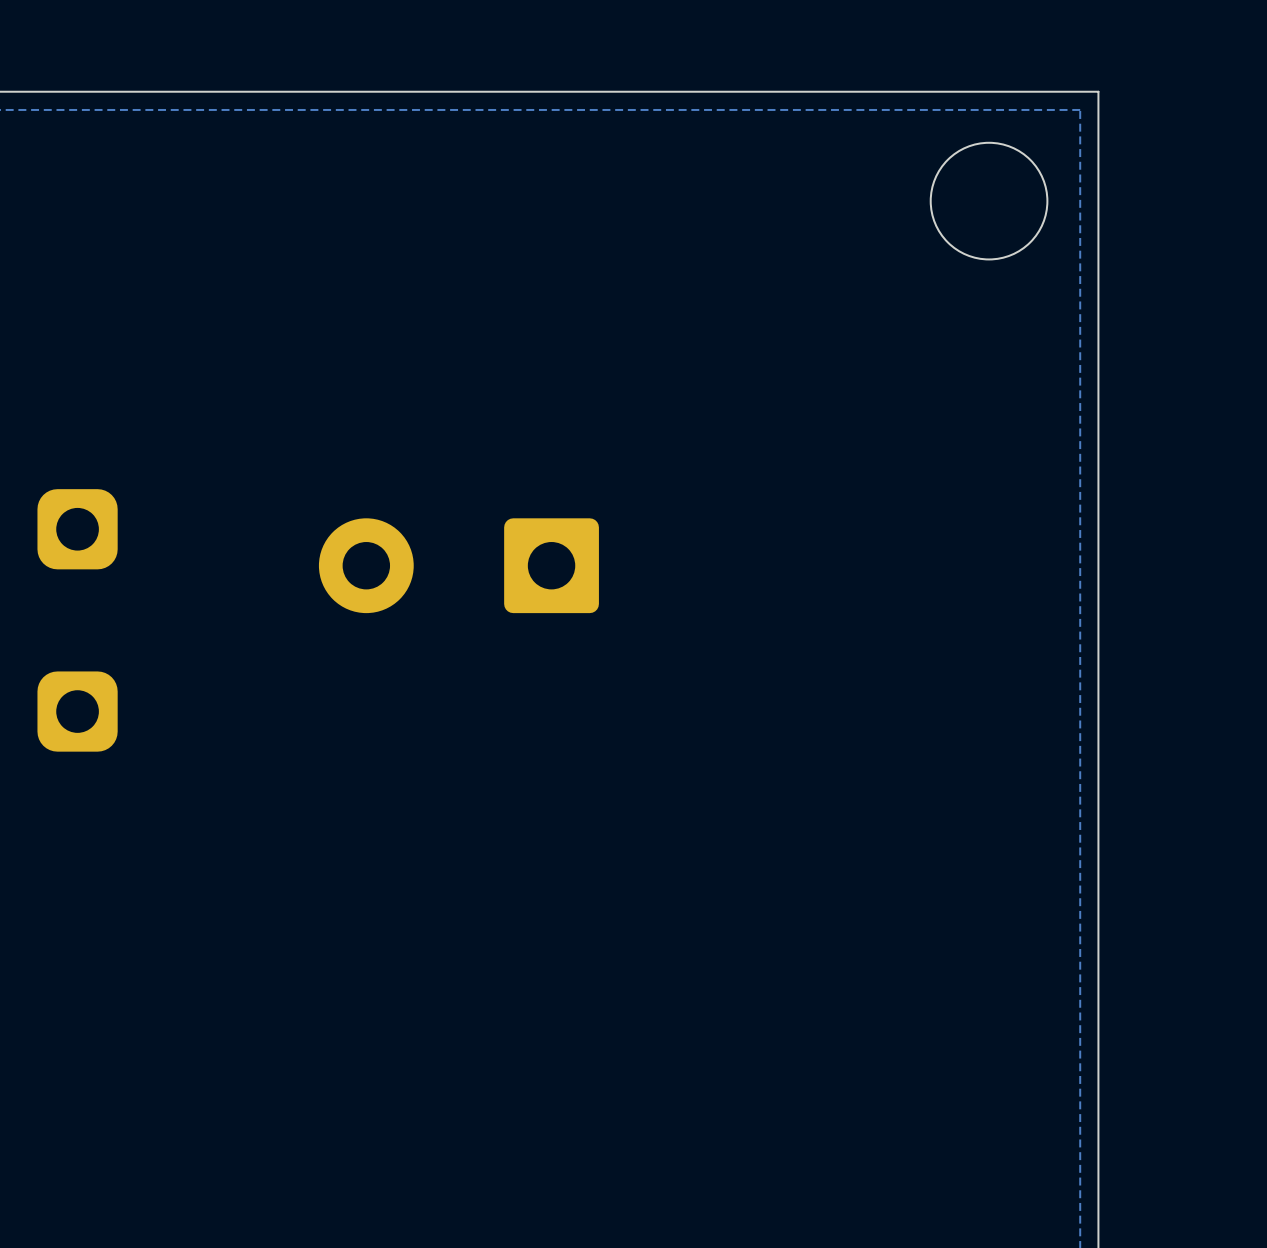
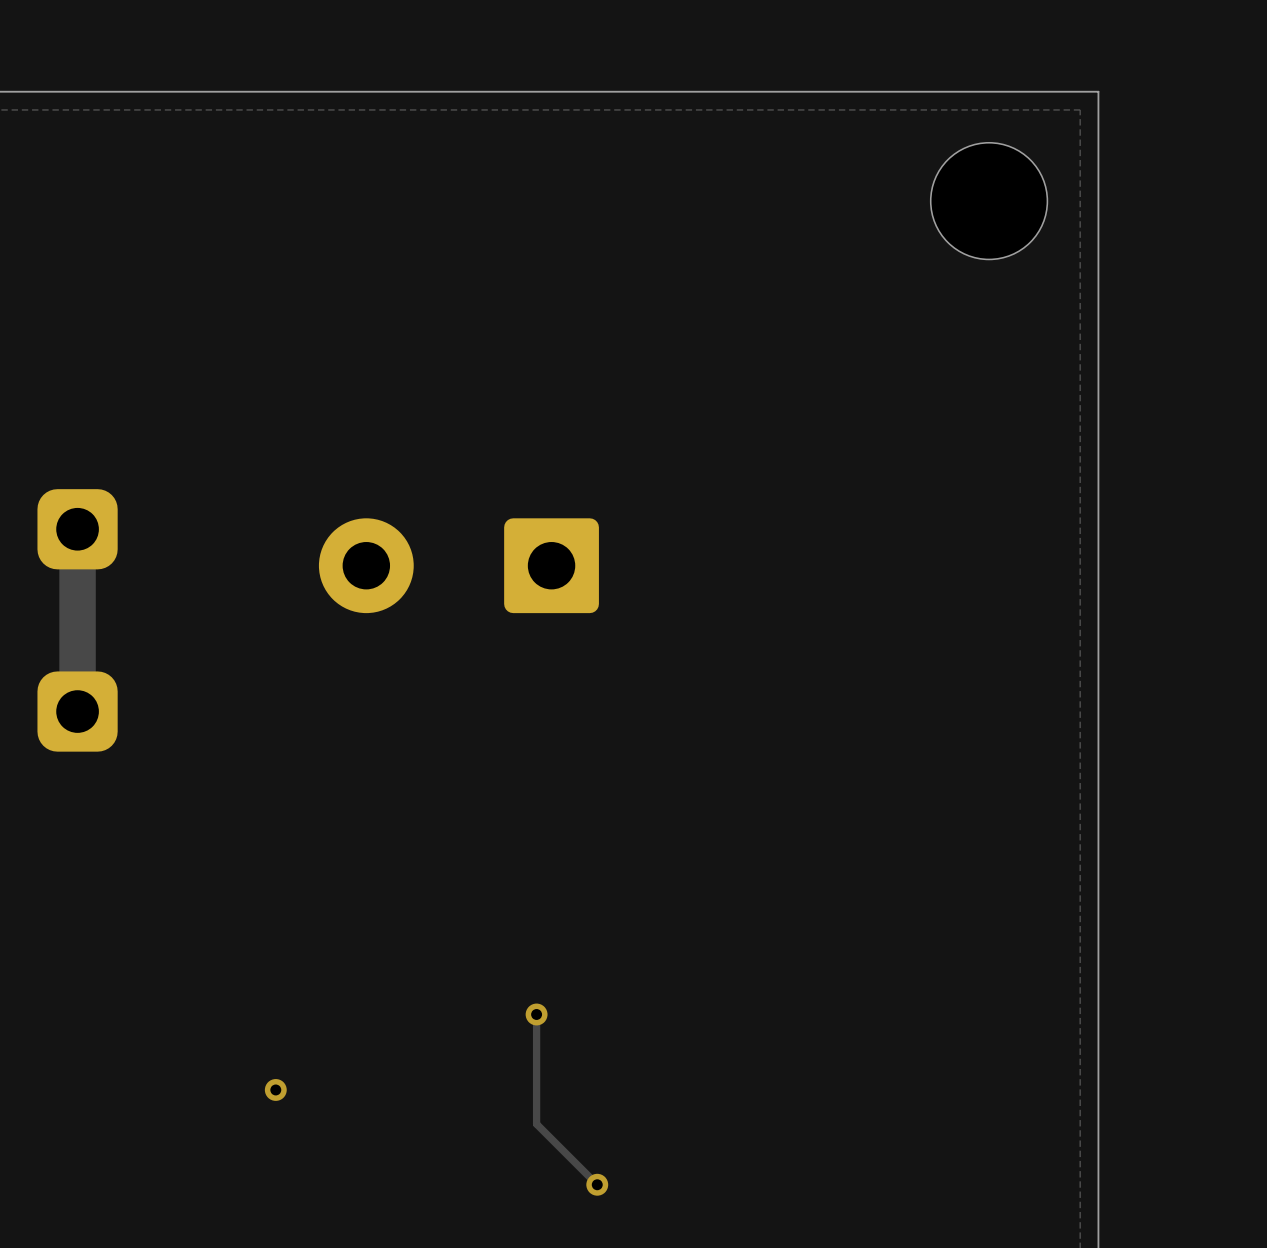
track: none -> (77, 529) (77, 711)
track: none -> (536, 1014) (536, 1124) (597, 1184)
via: none -> (536, 1014)
via: none -> (275, 1089)
via: none -> (597, 1184)

